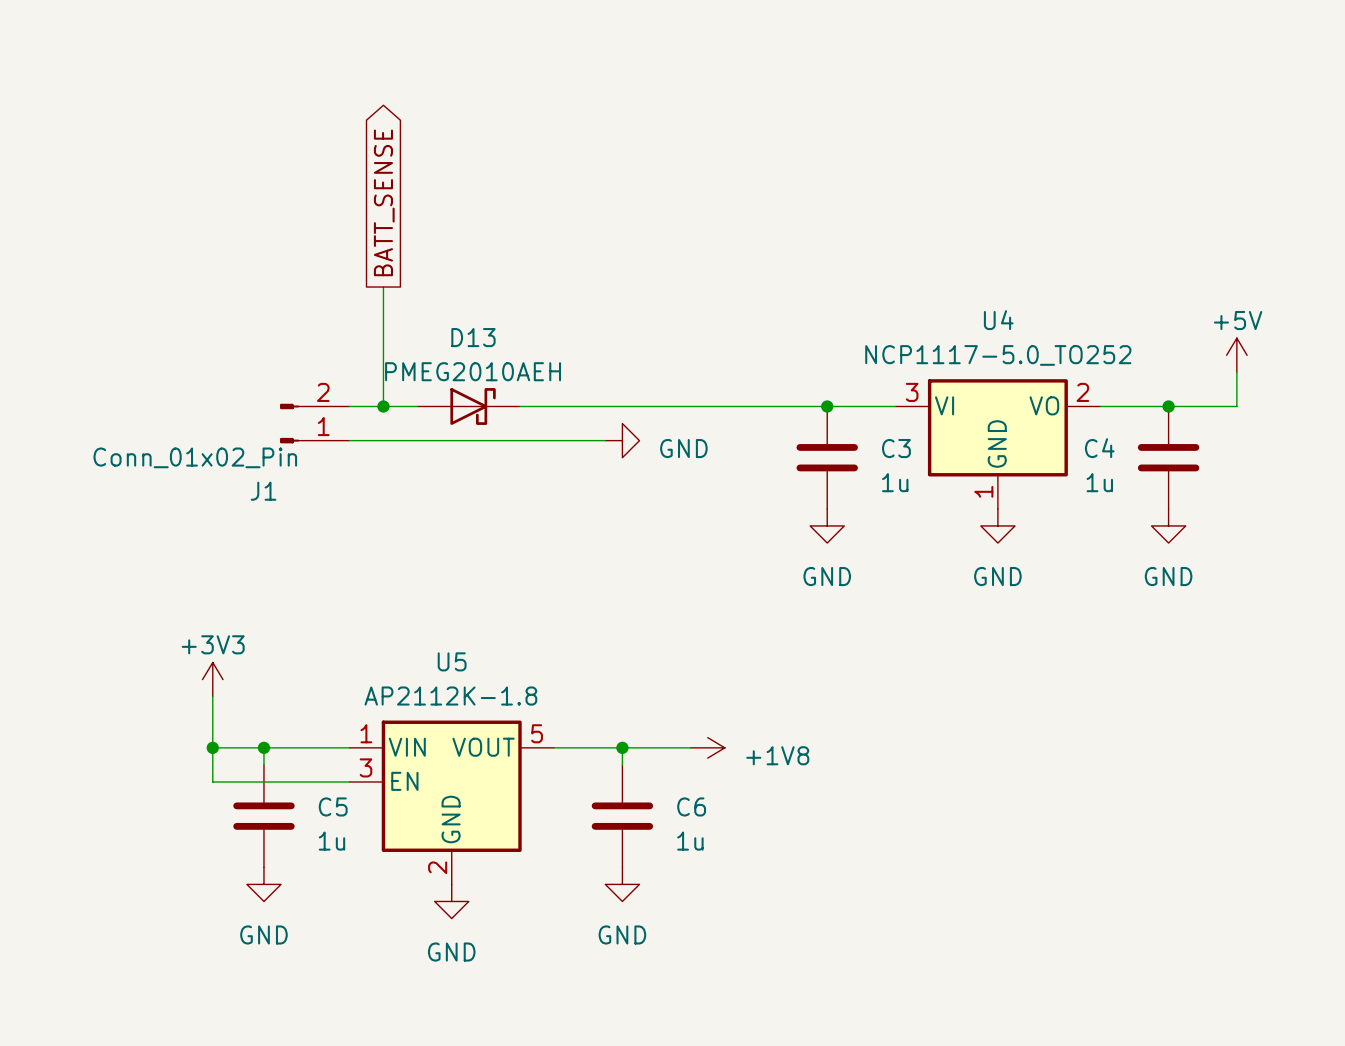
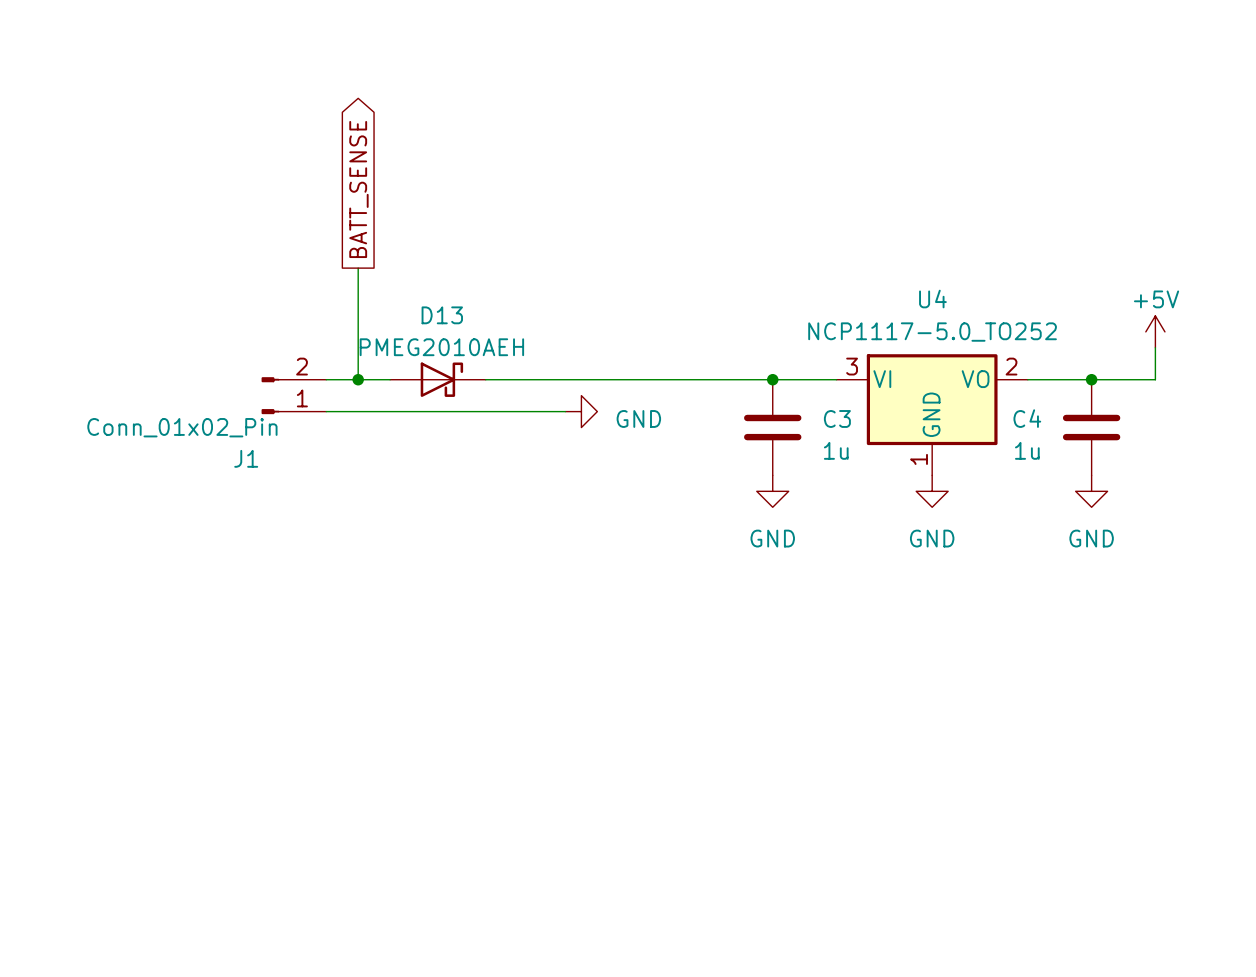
power symbol: +3V3 (212, 679) -> none
wire: (212, 696) (212, 781) (349, 781) -> none
wire: (212, 747) (349, 747) -> none
junction: (212, 747) -> none
wire: (263, 747) (263, 764) -> none
junction: (263, 747) -> none
wire: (554, 747) (690, 747) -> none
wire: (622, 747) (622, 764) -> none
junction: (622, 747) -> none
power symbol: +1V8 (707, 747) -> none
U5: AP2112K-1.8 (451, 802) -> none
C5: 1u (263, 816) -> none
C6: 1u (622, 816) -> none
power symbol: GND (263, 884) -> none
power symbol: GND (622, 884) -> none
power symbol: GND (451, 901) -> none

